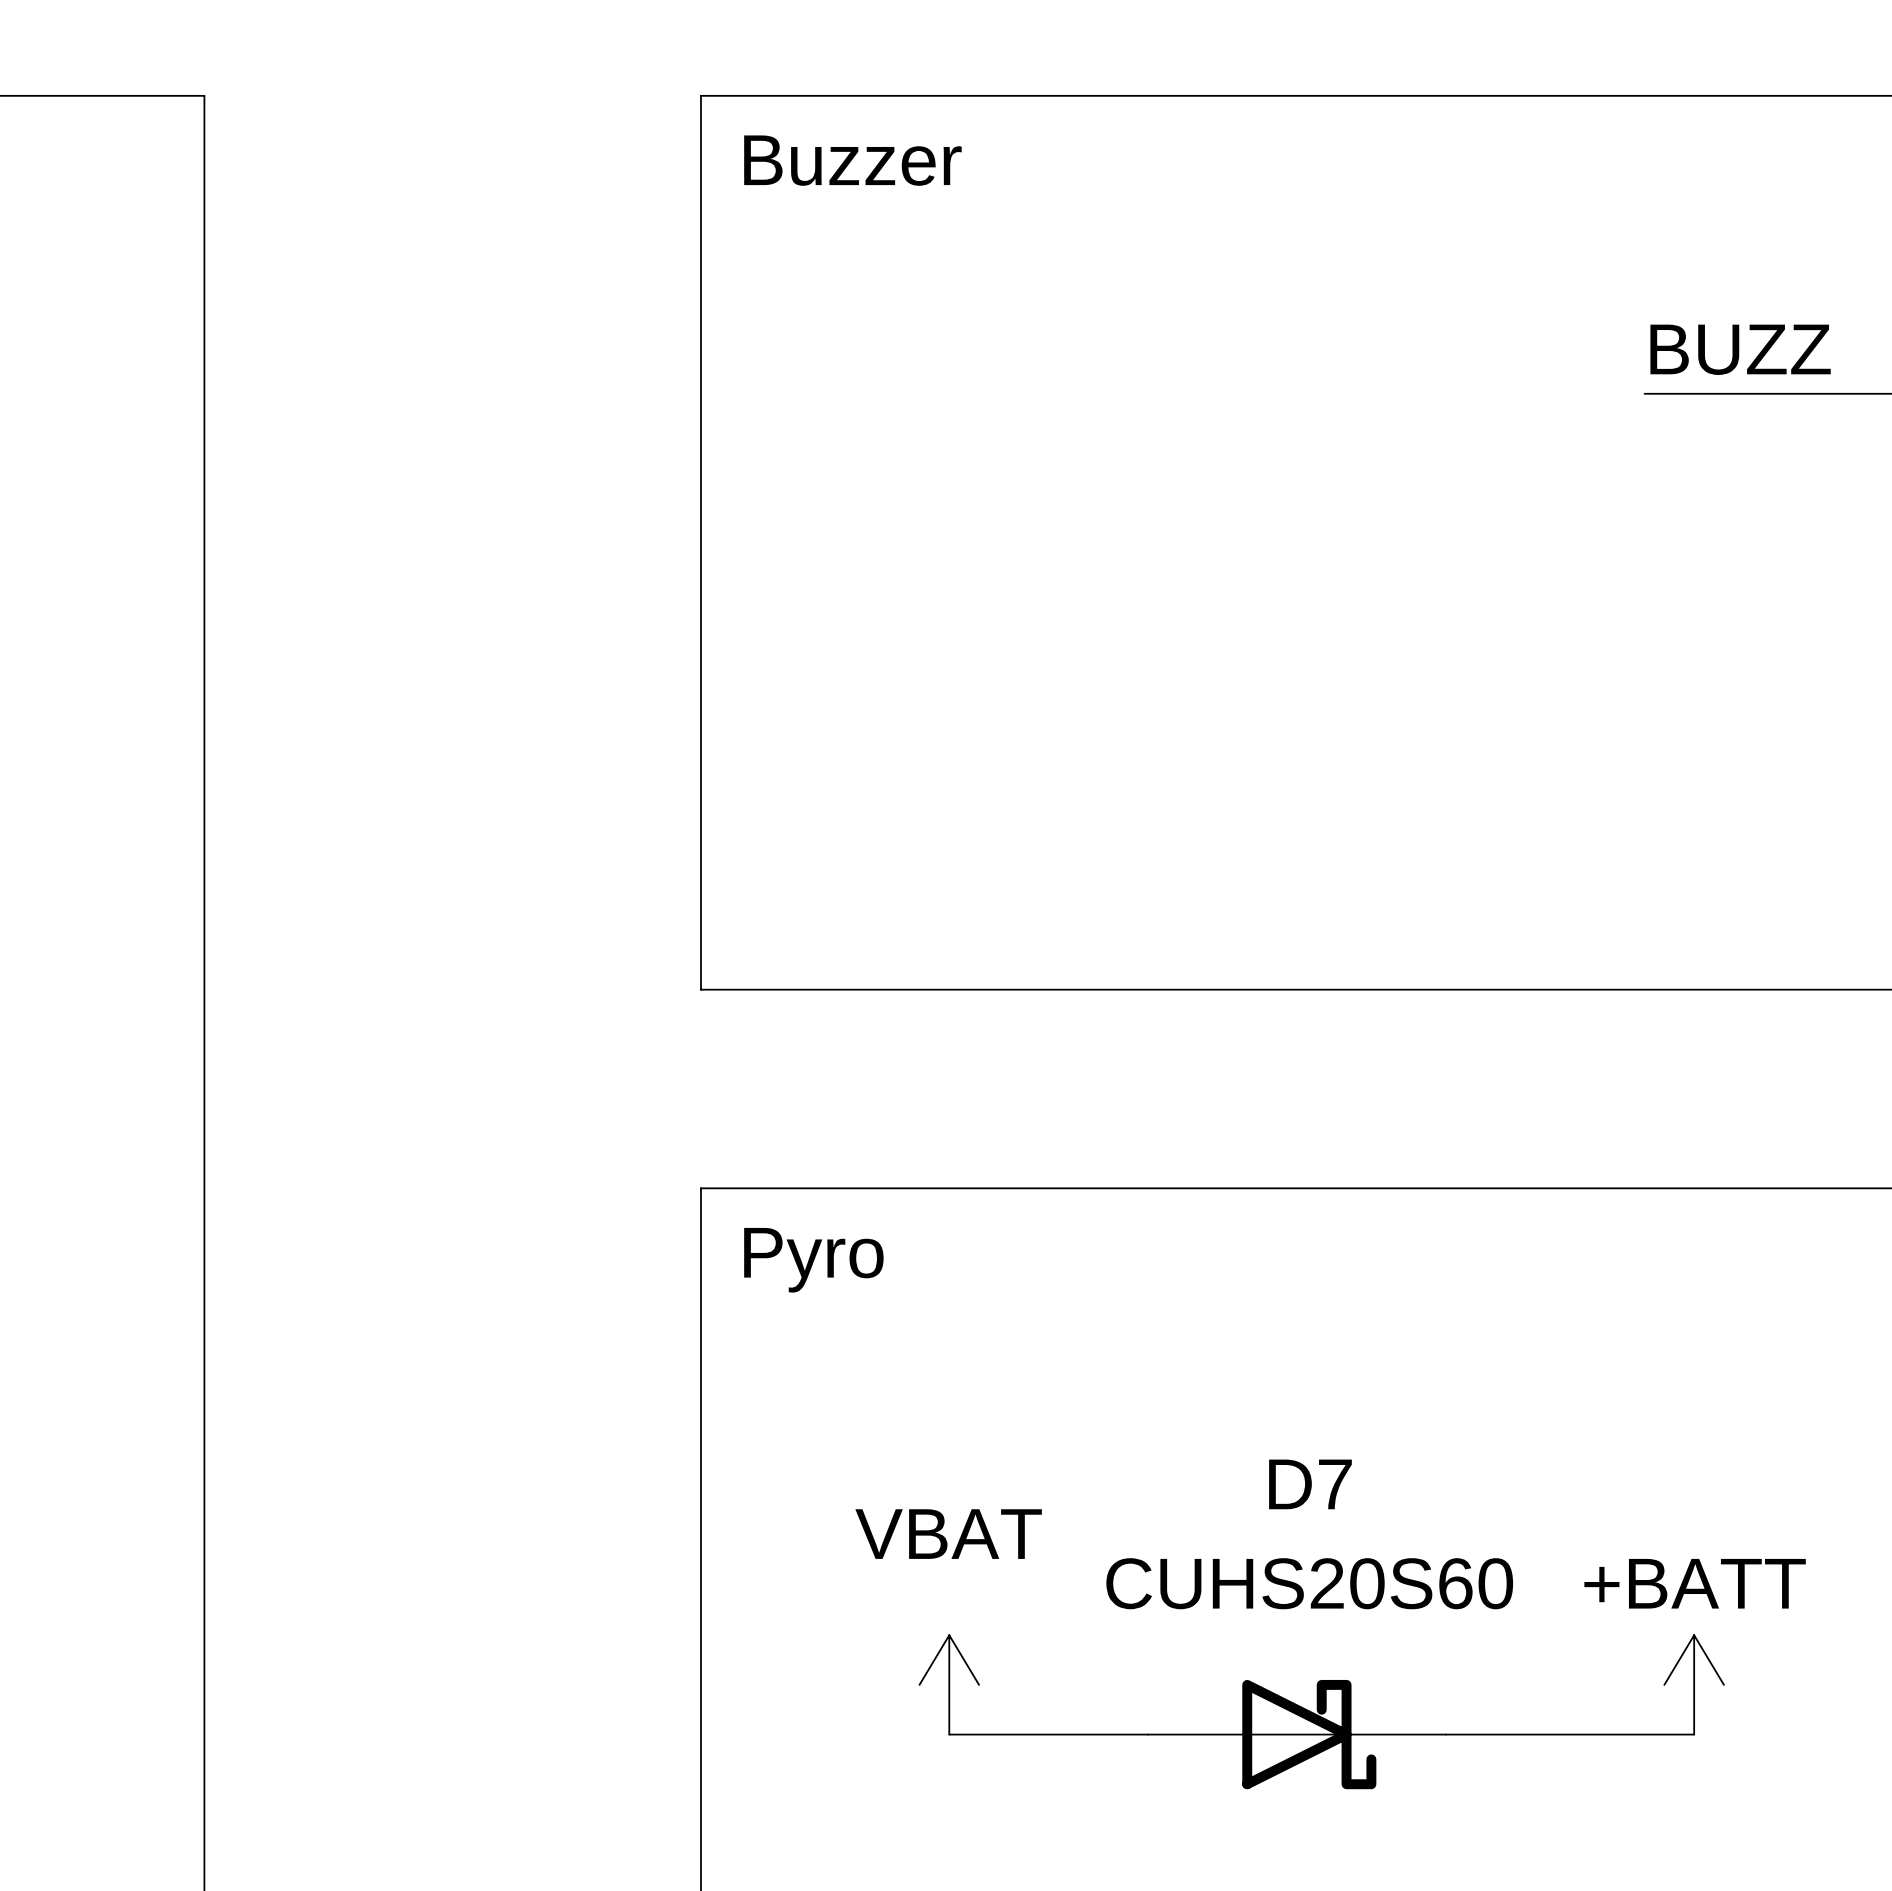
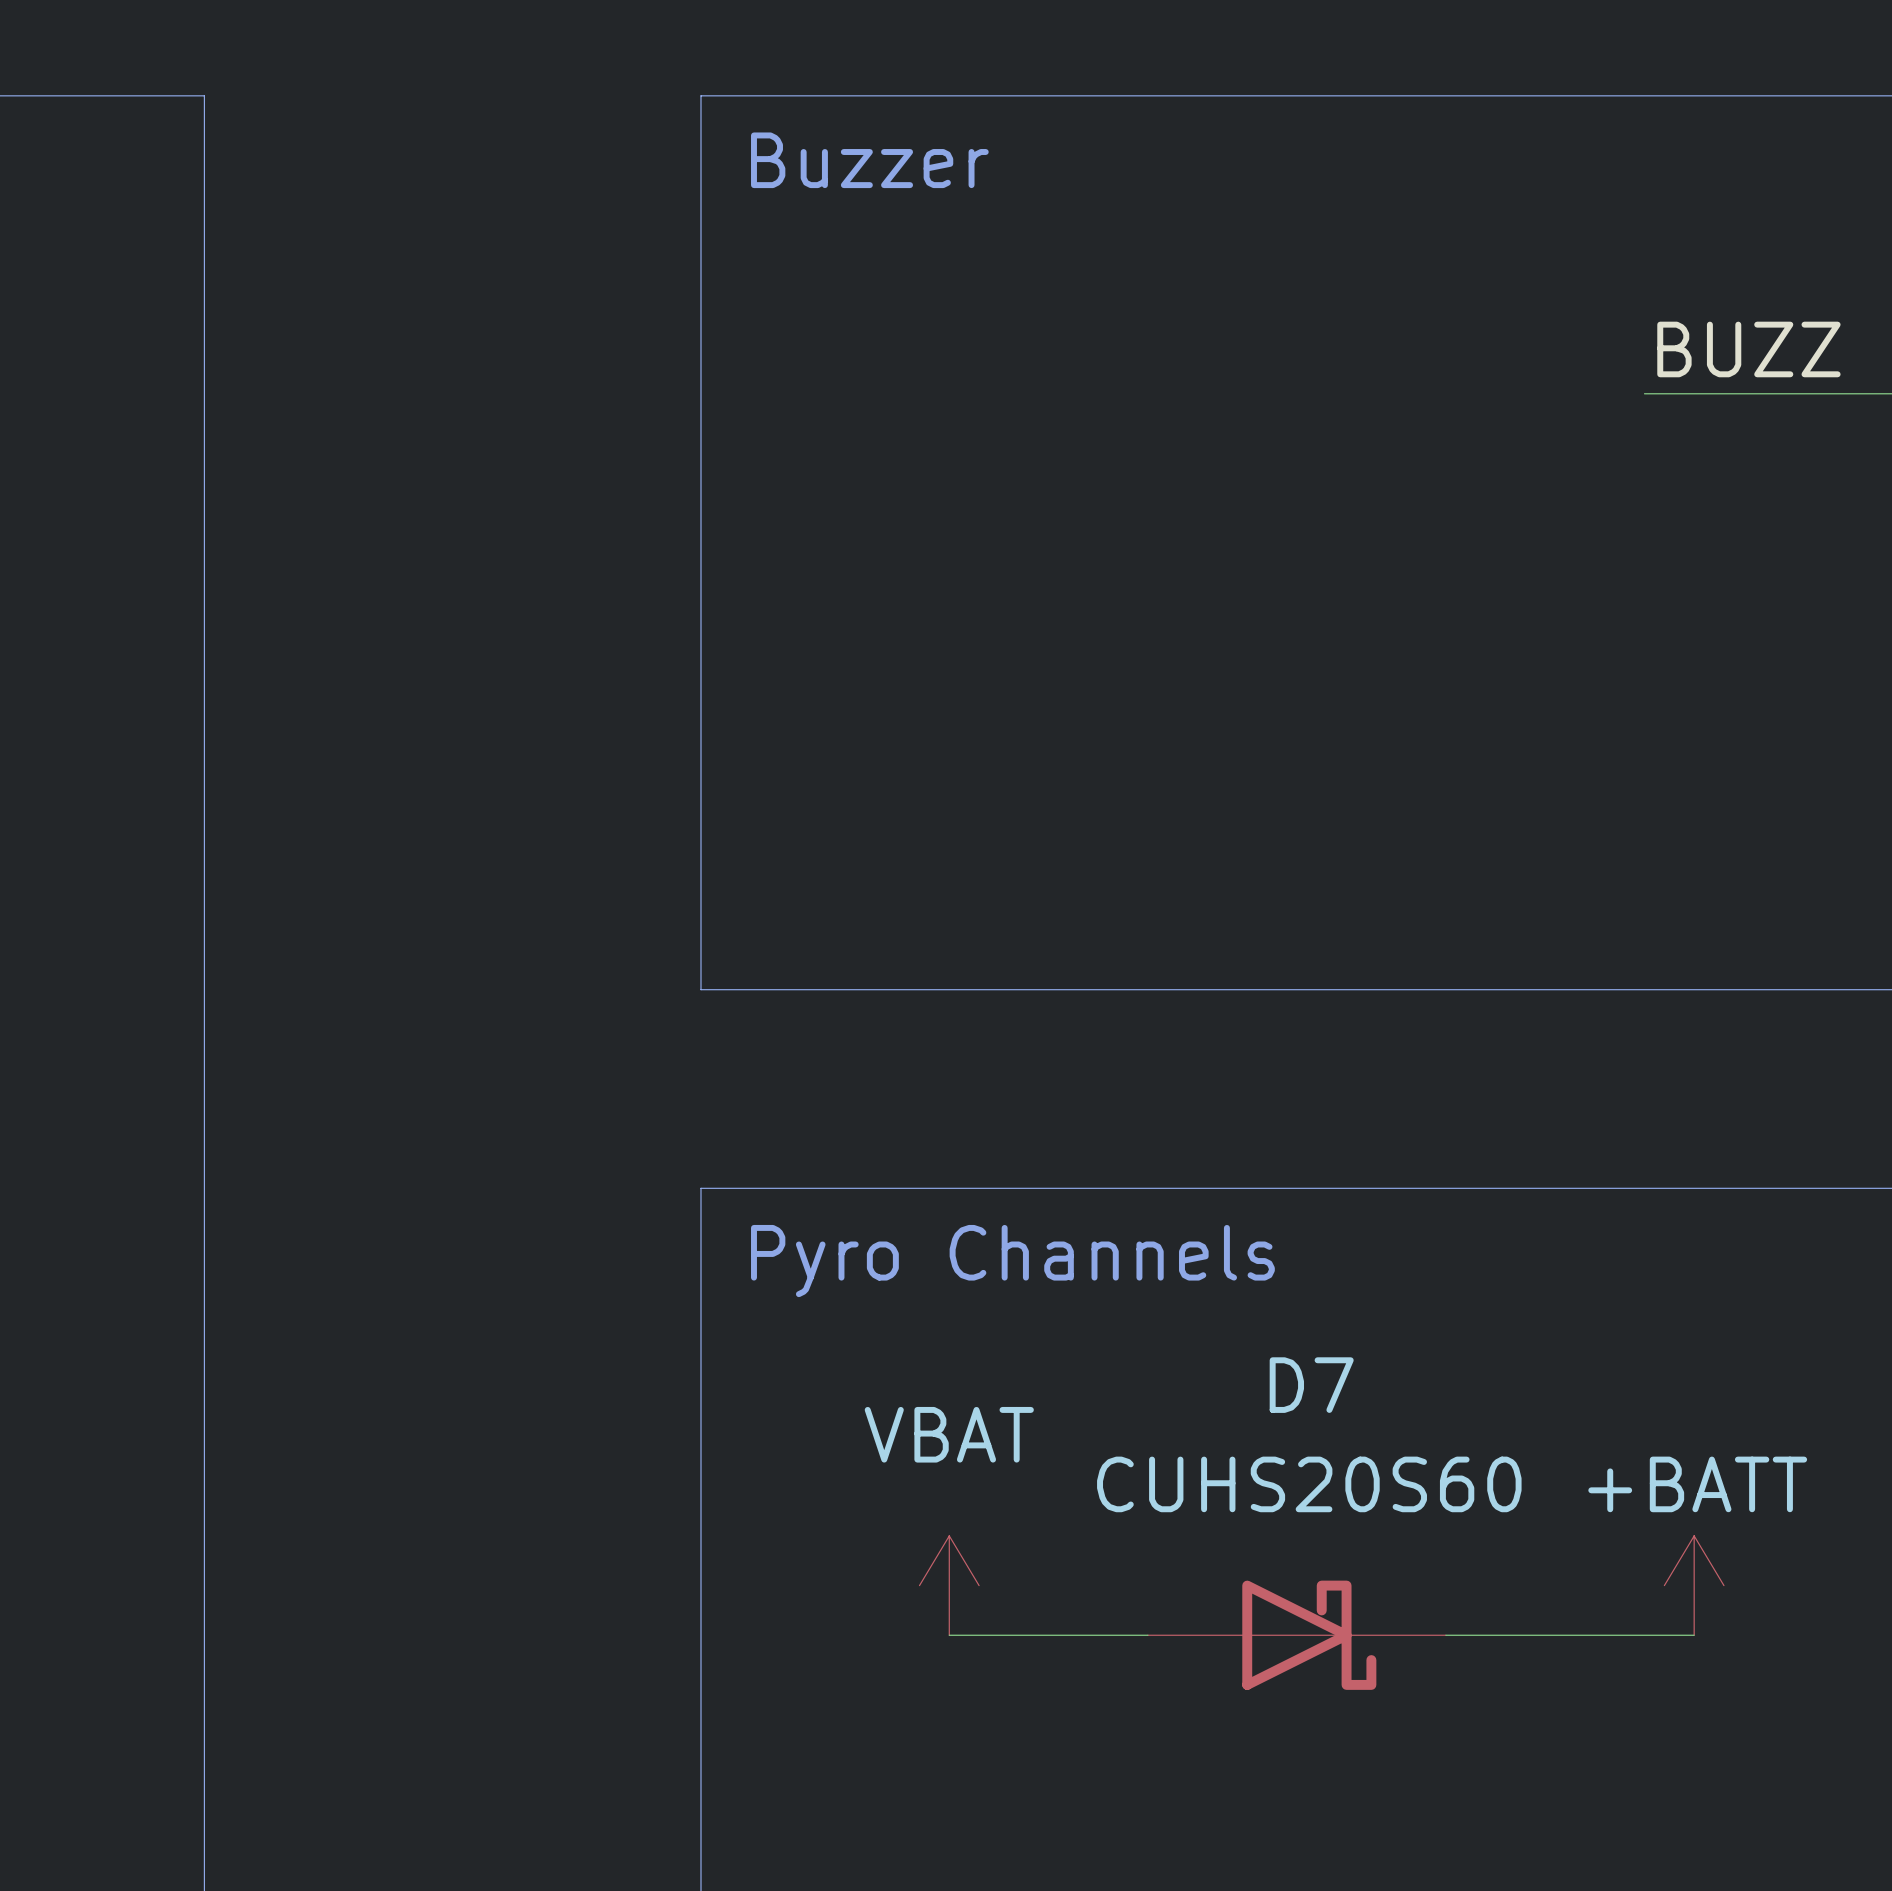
text: Pyro (813, 1260) -> Pyro Channels (1012, 1261)
power symbol position: VBAT (949, 1684) -> VBAT (949, 1585)
power symbol position: +BATT (1694, 1684) -> +BATT (1694, 1585)
wire: (949, 1734) (1147, 1734) -> (949, 1635) (1147, 1635)
D7 position: (1296, 1734) -> (1296, 1635)
wire: (1445, 1734) (1694, 1734) -> (1445, 1635) (1694, 1635)

